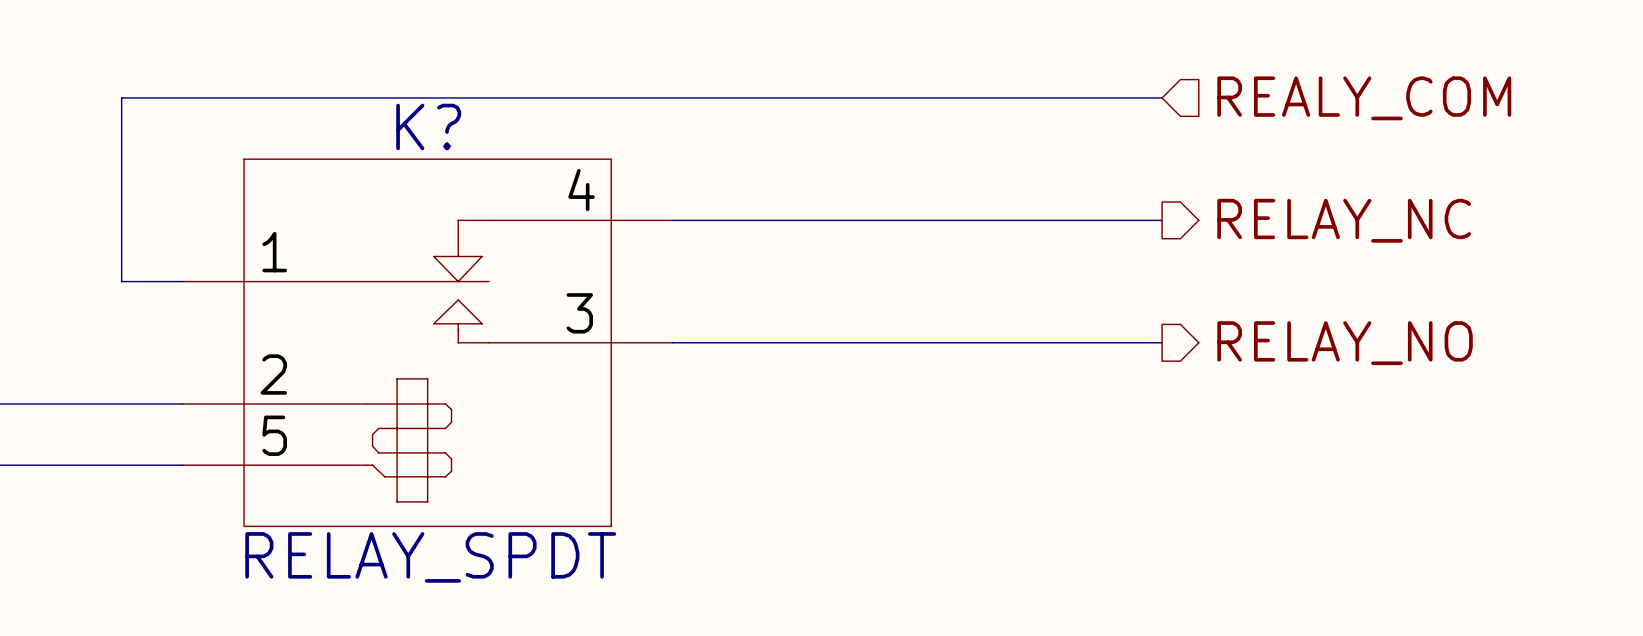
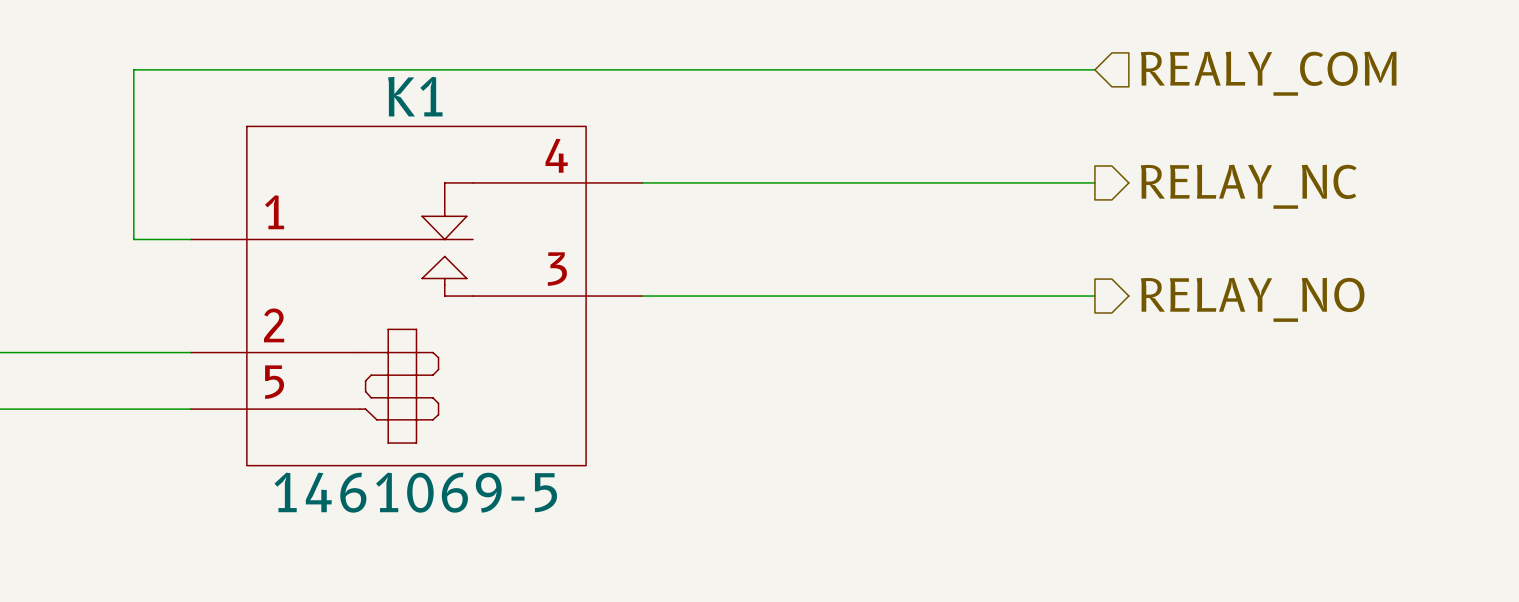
K? name: K? (428, 126) -> K1 (415, 96)
K? value: RELAY_SPDT (430, 557) -> 1461069-5 (415, 492)

